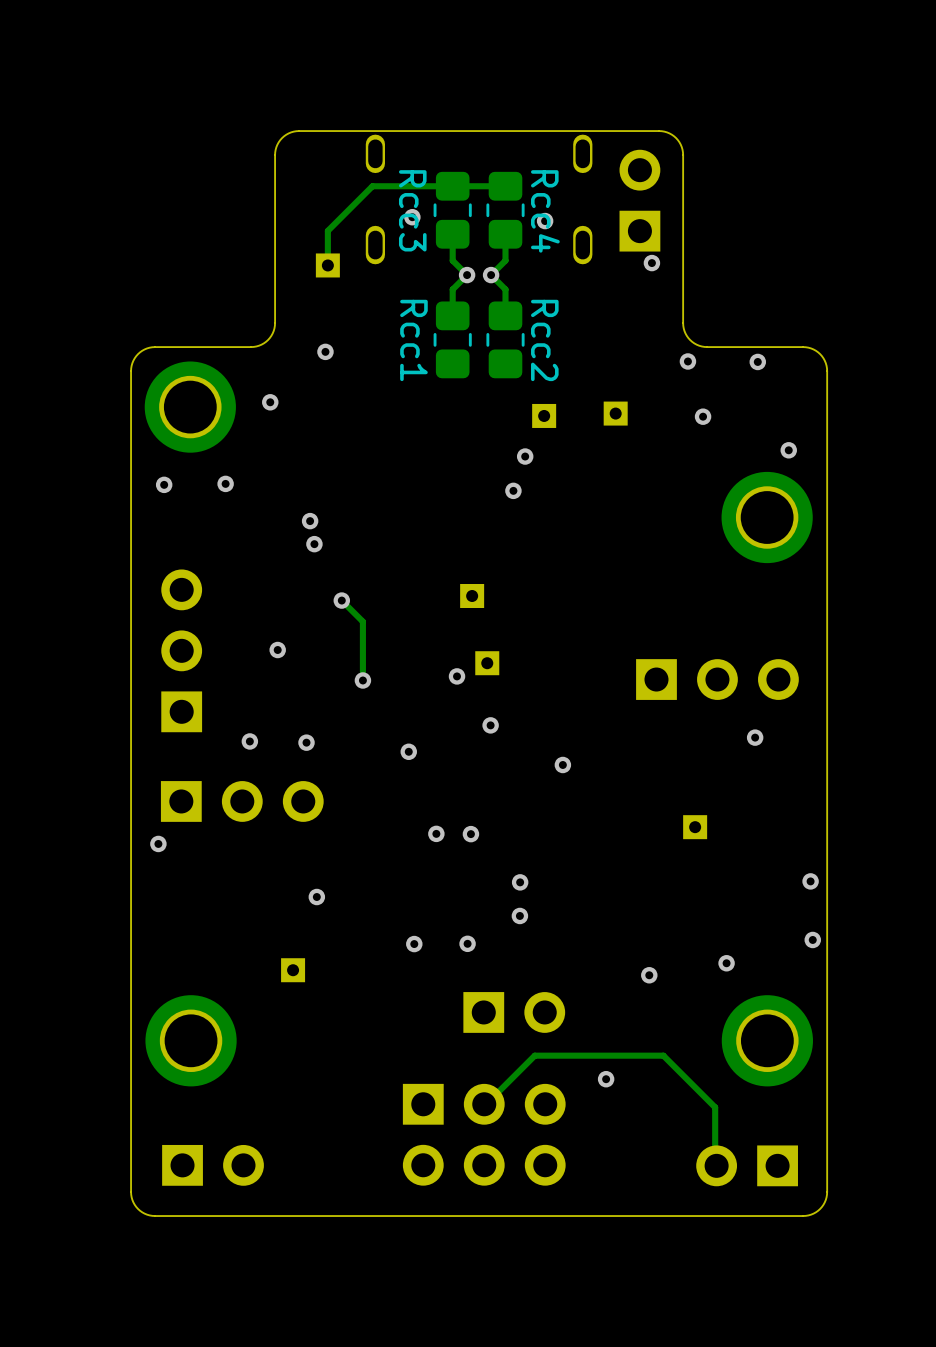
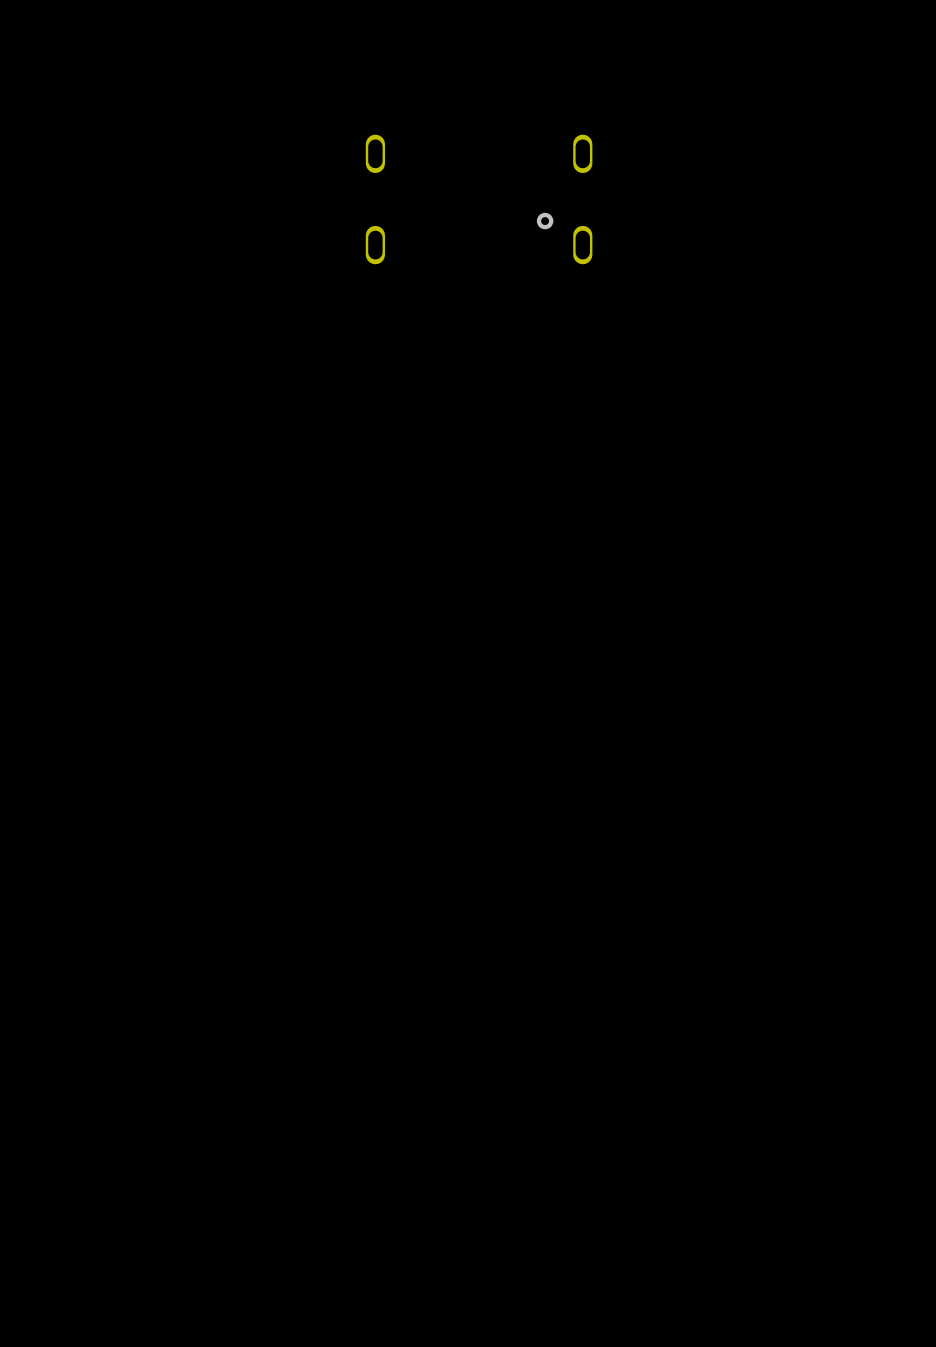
board edge: (659, 131) (299, 131) (288, 133) (280, 140) (275, 152) (275, 323) (271, 335) (263, 343) (253, 346) (149, 347) (140, 352) (133, 360) (131, 371) (131, 1192) (134, 1204) (144, 1213) (155, 1216) (803, 1216) (815, 1212) (824, 1202) (827, 1192) (827, 368) (820, 354) (808, 347) (704, 346) (694, 343) (686, 335) (683, 323) (682, 152) (680, 144) (674, 136) (659, 131) -> none
track: (505, 186) (372, 186) (327, 230) (327, 265) -> none
part: (639, 200) -> none
Rcc3: (452, 210) -> none
Rcc4: (505, 210) -> none
via: (412, 217) -> none
track: (452, 234) (452, 260) (467, 275) (452, 289) (452, 315) -> none
track: (505, 234) (505, 260) (491, 275) (505, 289) (505, 315) -> none
via: (651, 263) -> none
part: (327, 265) -> none
via: (467, 275) -> none
via: (491, 275) -> none
Rcc1: (452, 339) -> none
Rcc2: (505, 339) -> none
via: (325, 351) -> none
via: (687, 361) -> none
via: (757, 361) -> none
via: (270, 402) -> none
part: (190, 407) -> none
part: (615, 413) -> none
part: (544, 415) -> none
via: (703, 416) -> none
via: (788, 450) -> none
via: (525, 456) -> none
via: (225, 483) -> none
via: (164, 484) -> none
via: (513, 490) -> none
part: (767, 517) -> none
via: (310, 521) -> none
via: (314, 544) -> none
part: (472, 596) -> none
track: (341, 600) (362, 621) (362, 680) -> none
via: (341, 600) -> none
part: (181, 650) -> none
via: (277, 650) -> none
part: (487, 663) -> none
via: (457, 676) -> none
part: (717, 679) -> none
via: (362, 680) -> none
via: (490, 725) -> none
via: (755, 737) -> none
via: (249, 741) -> none
via: (306, 742) -> none
via: (408, 751) -> none
via: (562, 764) -> none
part: (242, 801) -> none
part: (695, 827) -> none
via: (436, 833) -> none
via: (470, 834) -> none
via: (158, 843) -> none
via: (810, 881) -> none
via: (520, 882) -> none
via: (316, 897) -> none
via: (519, 915) -> none
via: (812, 939) -> none
via: (467, 943) -> none
via: (414, 944) -> none
via: (726, 963) -> none
part: (293, 970) -> none
via: (649, 975) -> none
part: (514, 1012) -> none
part: (191, 1040) -> none
part: (767, 1040) -> none
via: (606, 1079) -> none
track: (487, 1103) (534, 1055) (663, 1055) (715, 1107) (715, 1168) -> none
part: (484, 1134) -> none
part: (213, 1165) -> none
part: (747, 1165) -> none

